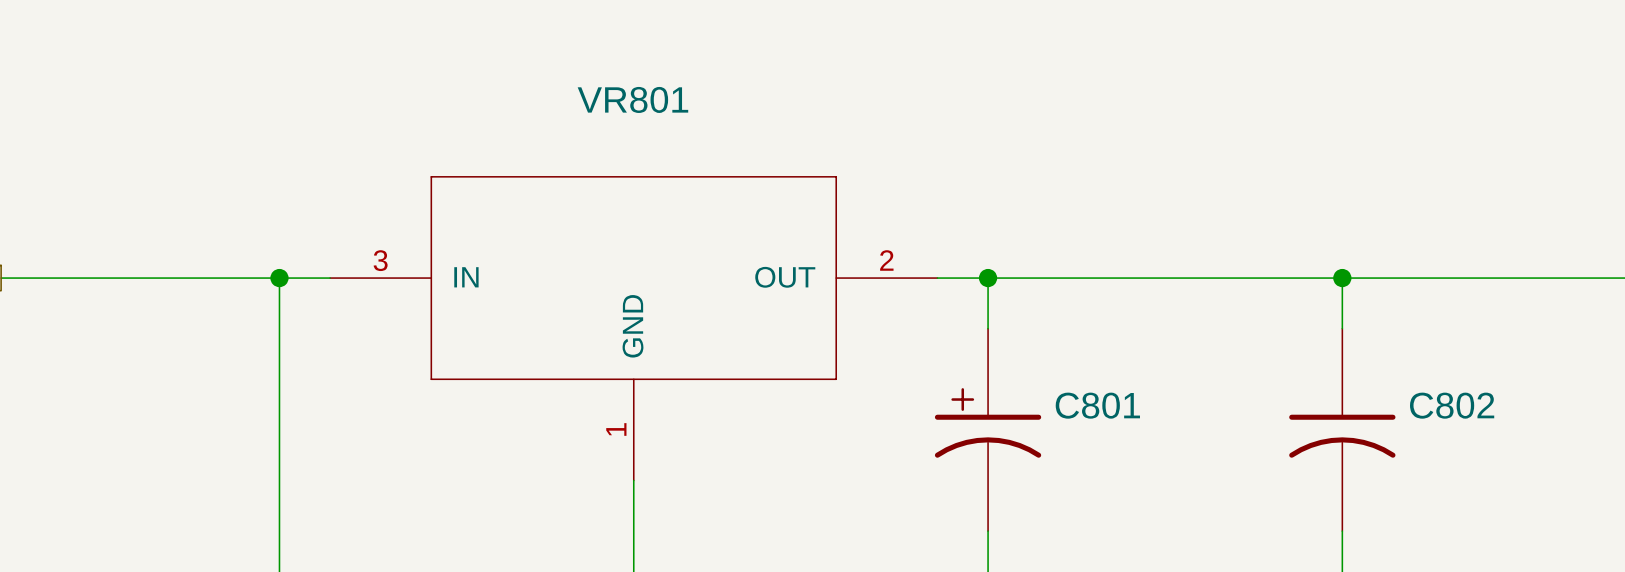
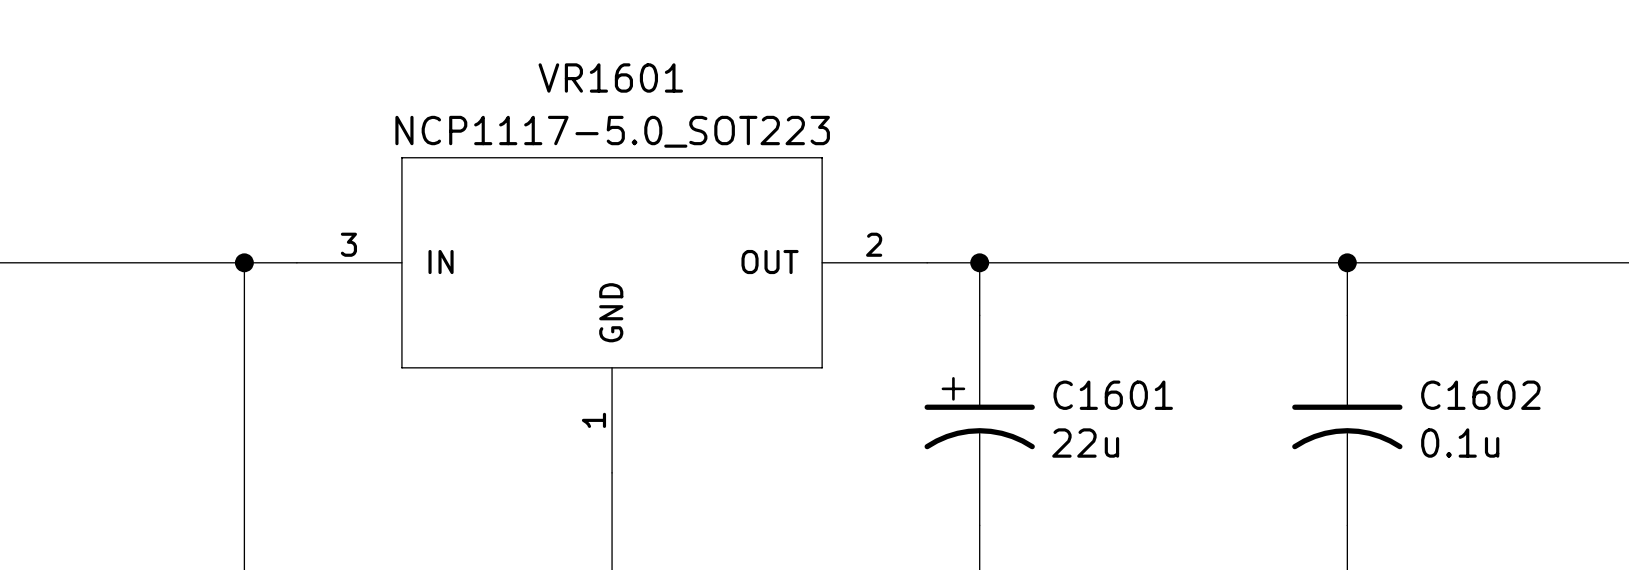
VR801 name: VR801 (632, 99) -> VR1601 (610, 77)
VR801 value: none -> NCP1117-5.0_SOT223 (612, 131)
C801 name: C801 (1097, 405) -> C1601 (1113, 395)
C802 name: C802 (1452, 405) -> C1602 (1480, 395)
C801 value: none -> 22u (1085, 443)
C802 value: none -> 0.1u (1460, 443)

